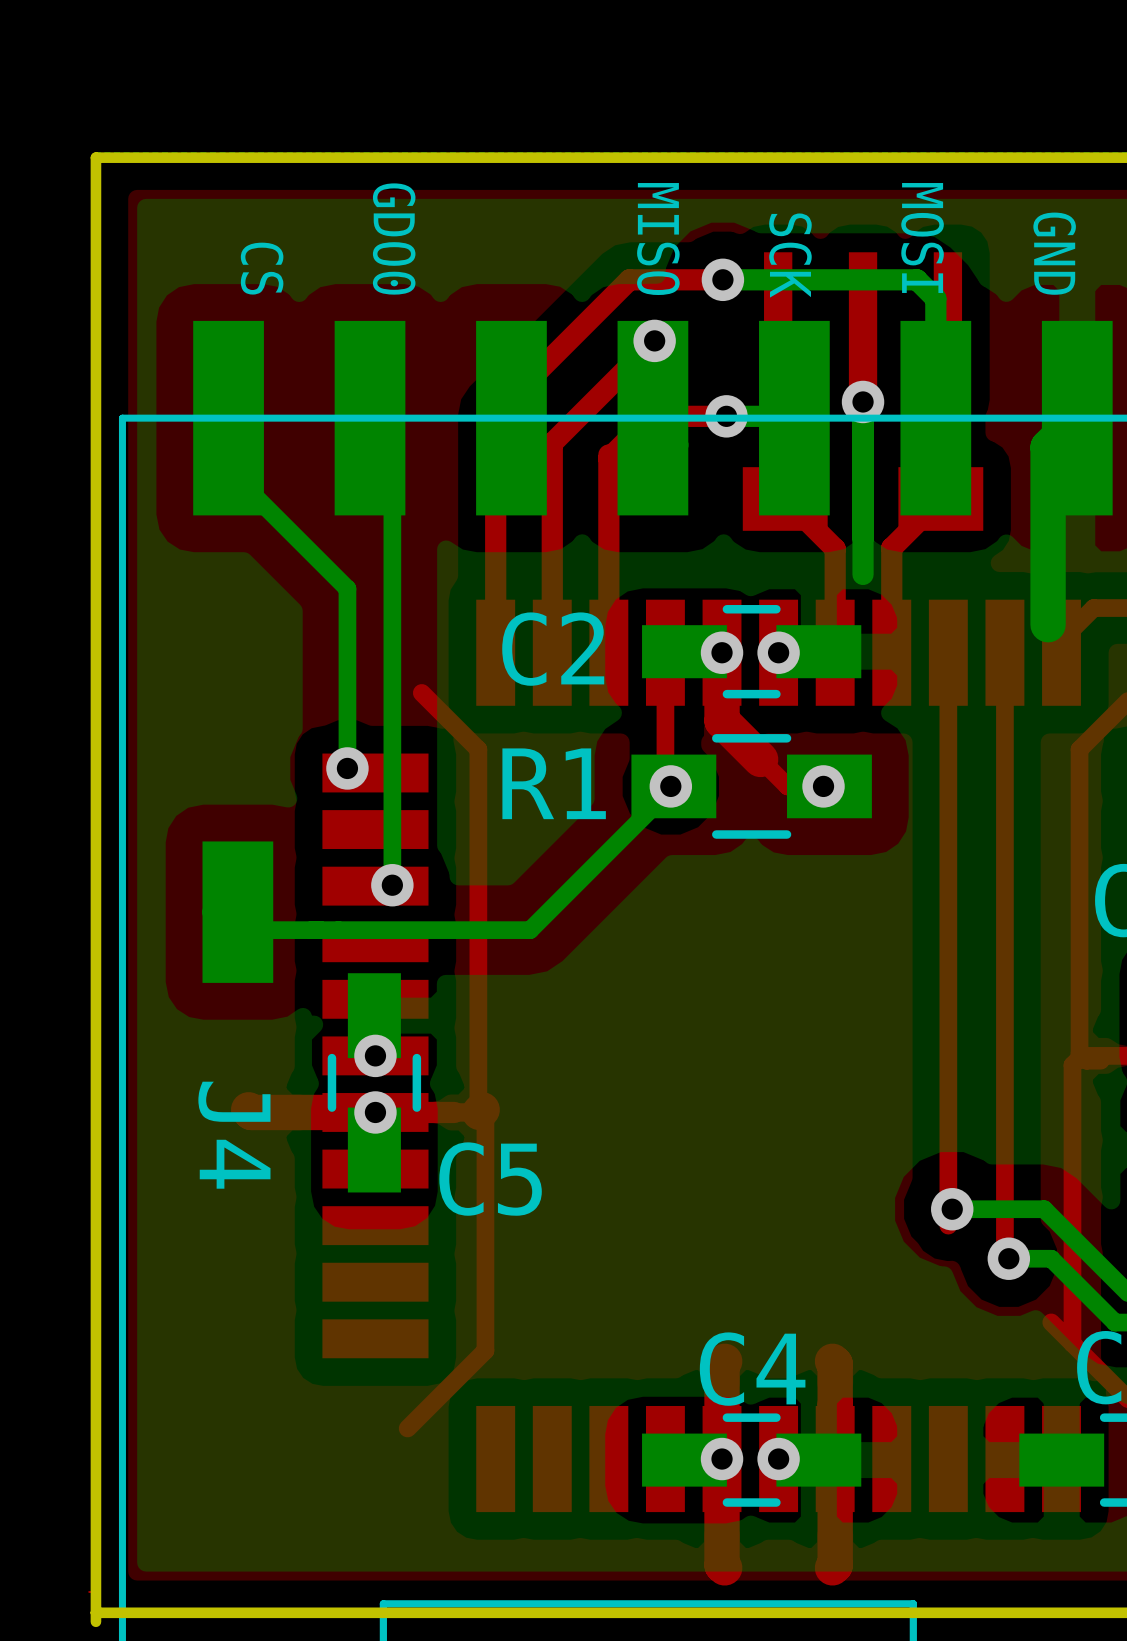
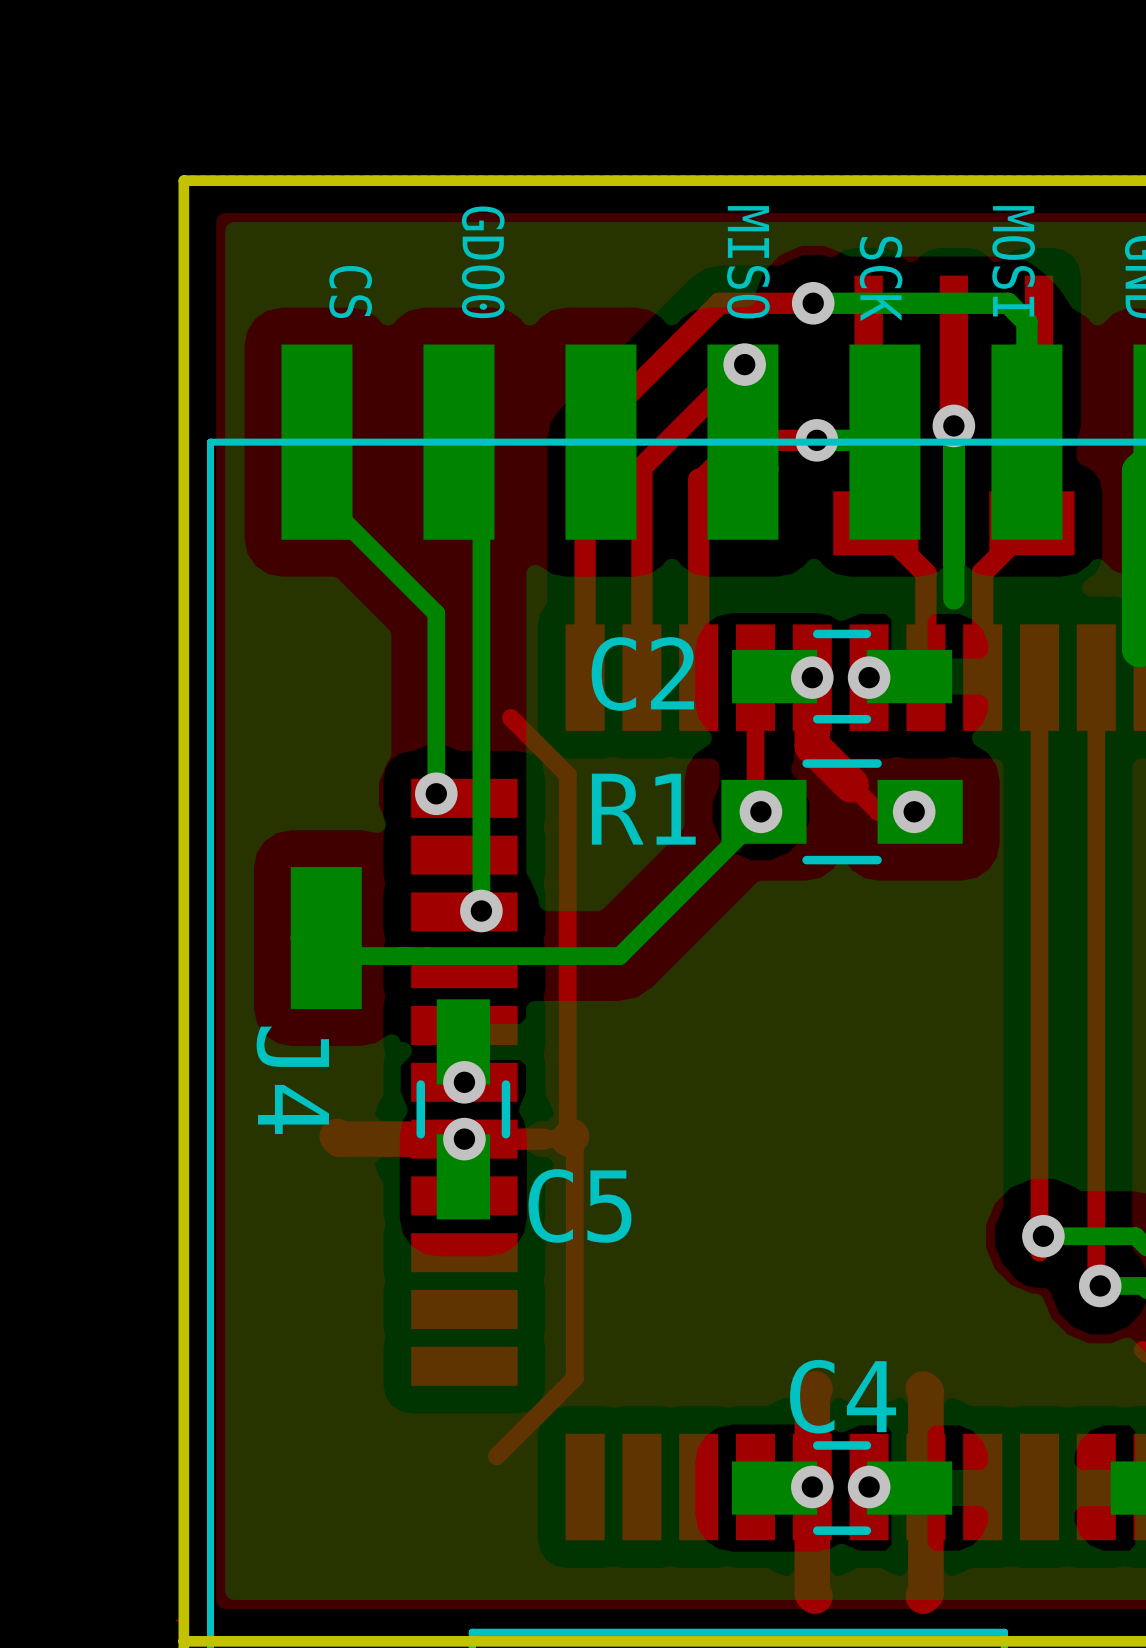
J4 name position: J4 (234, 1135) -> J4 (292, 1080)

